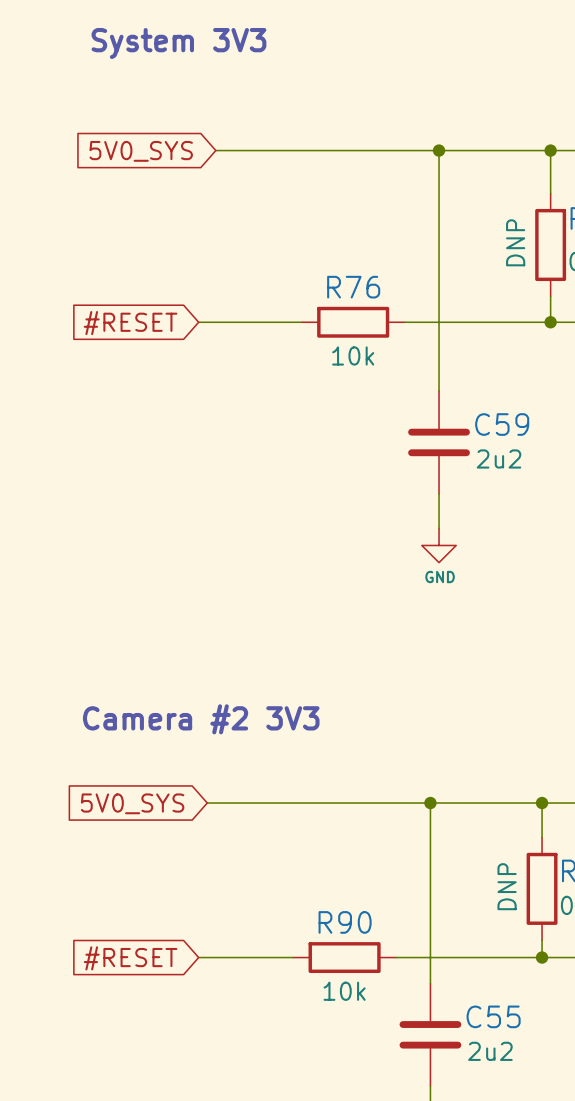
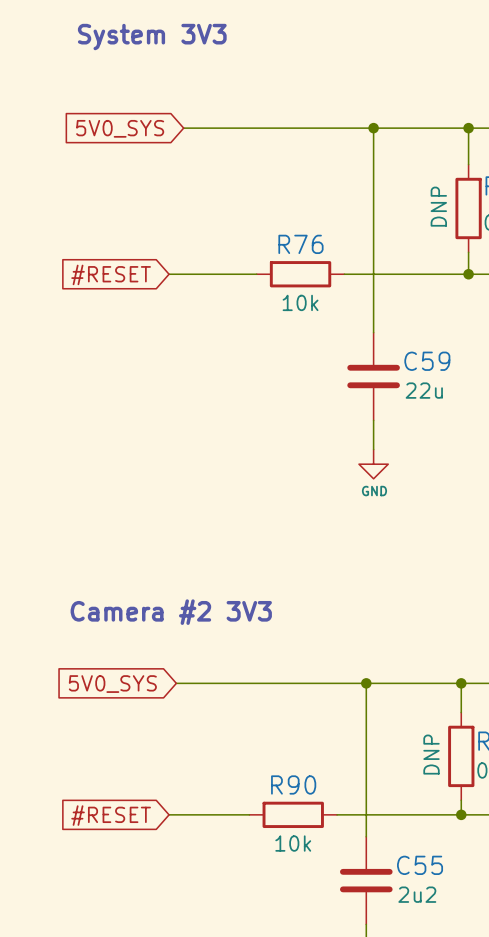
C59 text: 2u2 (498, 458) -> 22u (424, 390)

